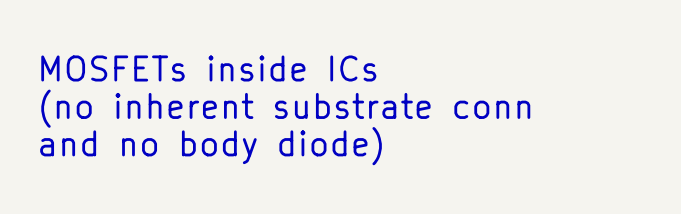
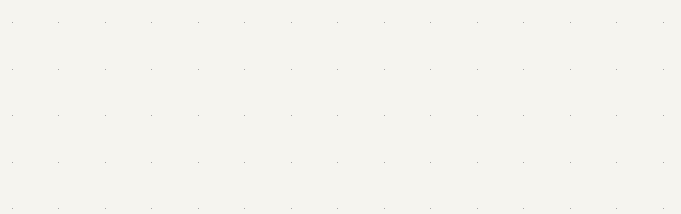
text: MOSFETs inside ICs (208, 68) -> none
text: (no inherent substrate conn (285, 108) -> none
text: and no body diode) (211, 146) -> none

